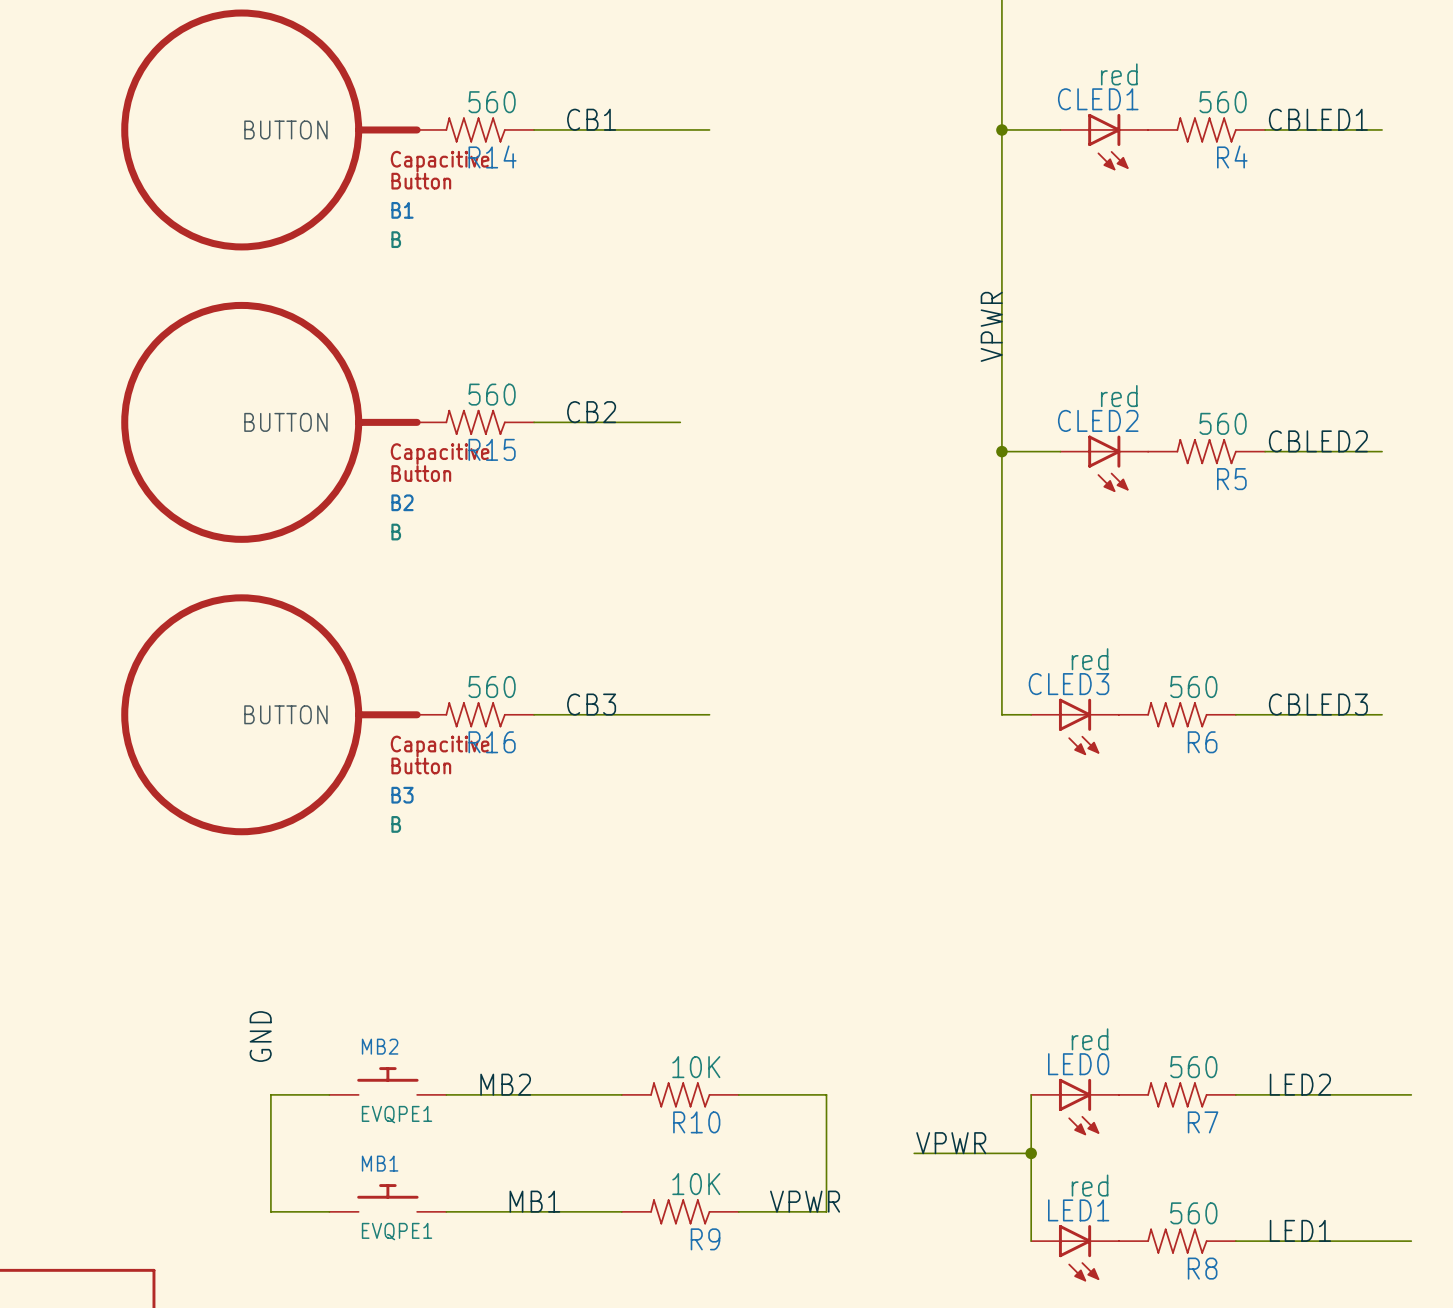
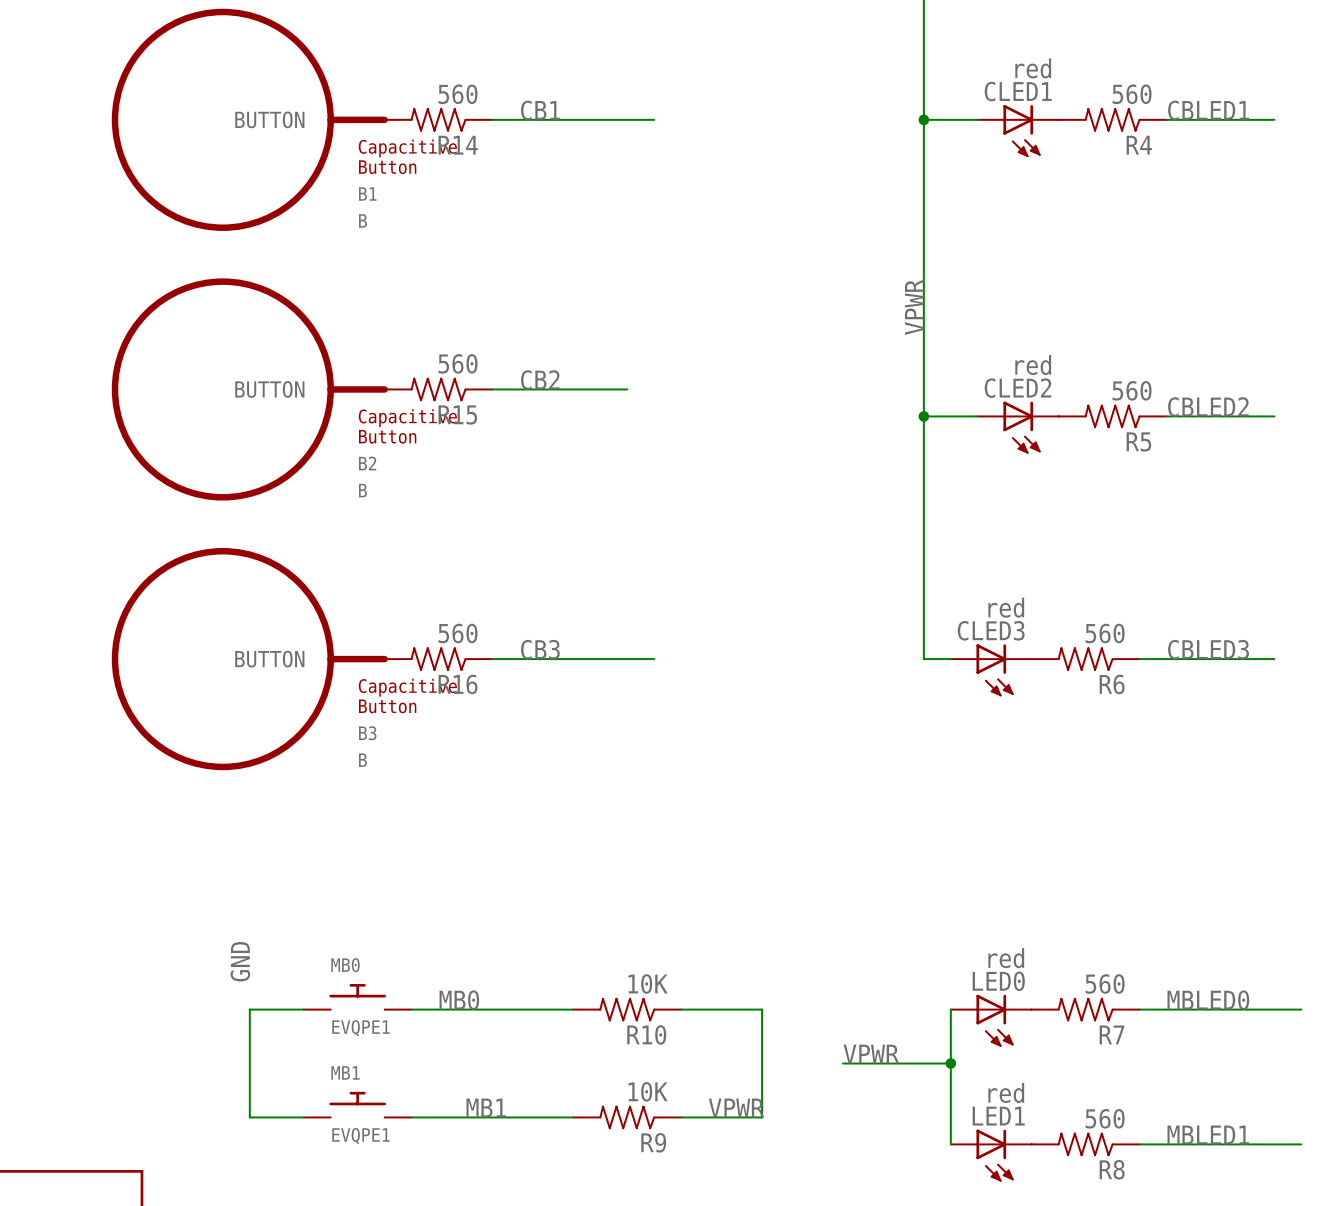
MB2 name: MB2 (380, 1046) -> MB0 (345, 965)
label: MB2 (505, 1084) -> MB0 (459, 1000)
label: LED2 (1300, 1084) -> MBLED0 (1208, 1000)
label: LED1 (1300, 1230) -> MBLED1 (1208, 1134)

